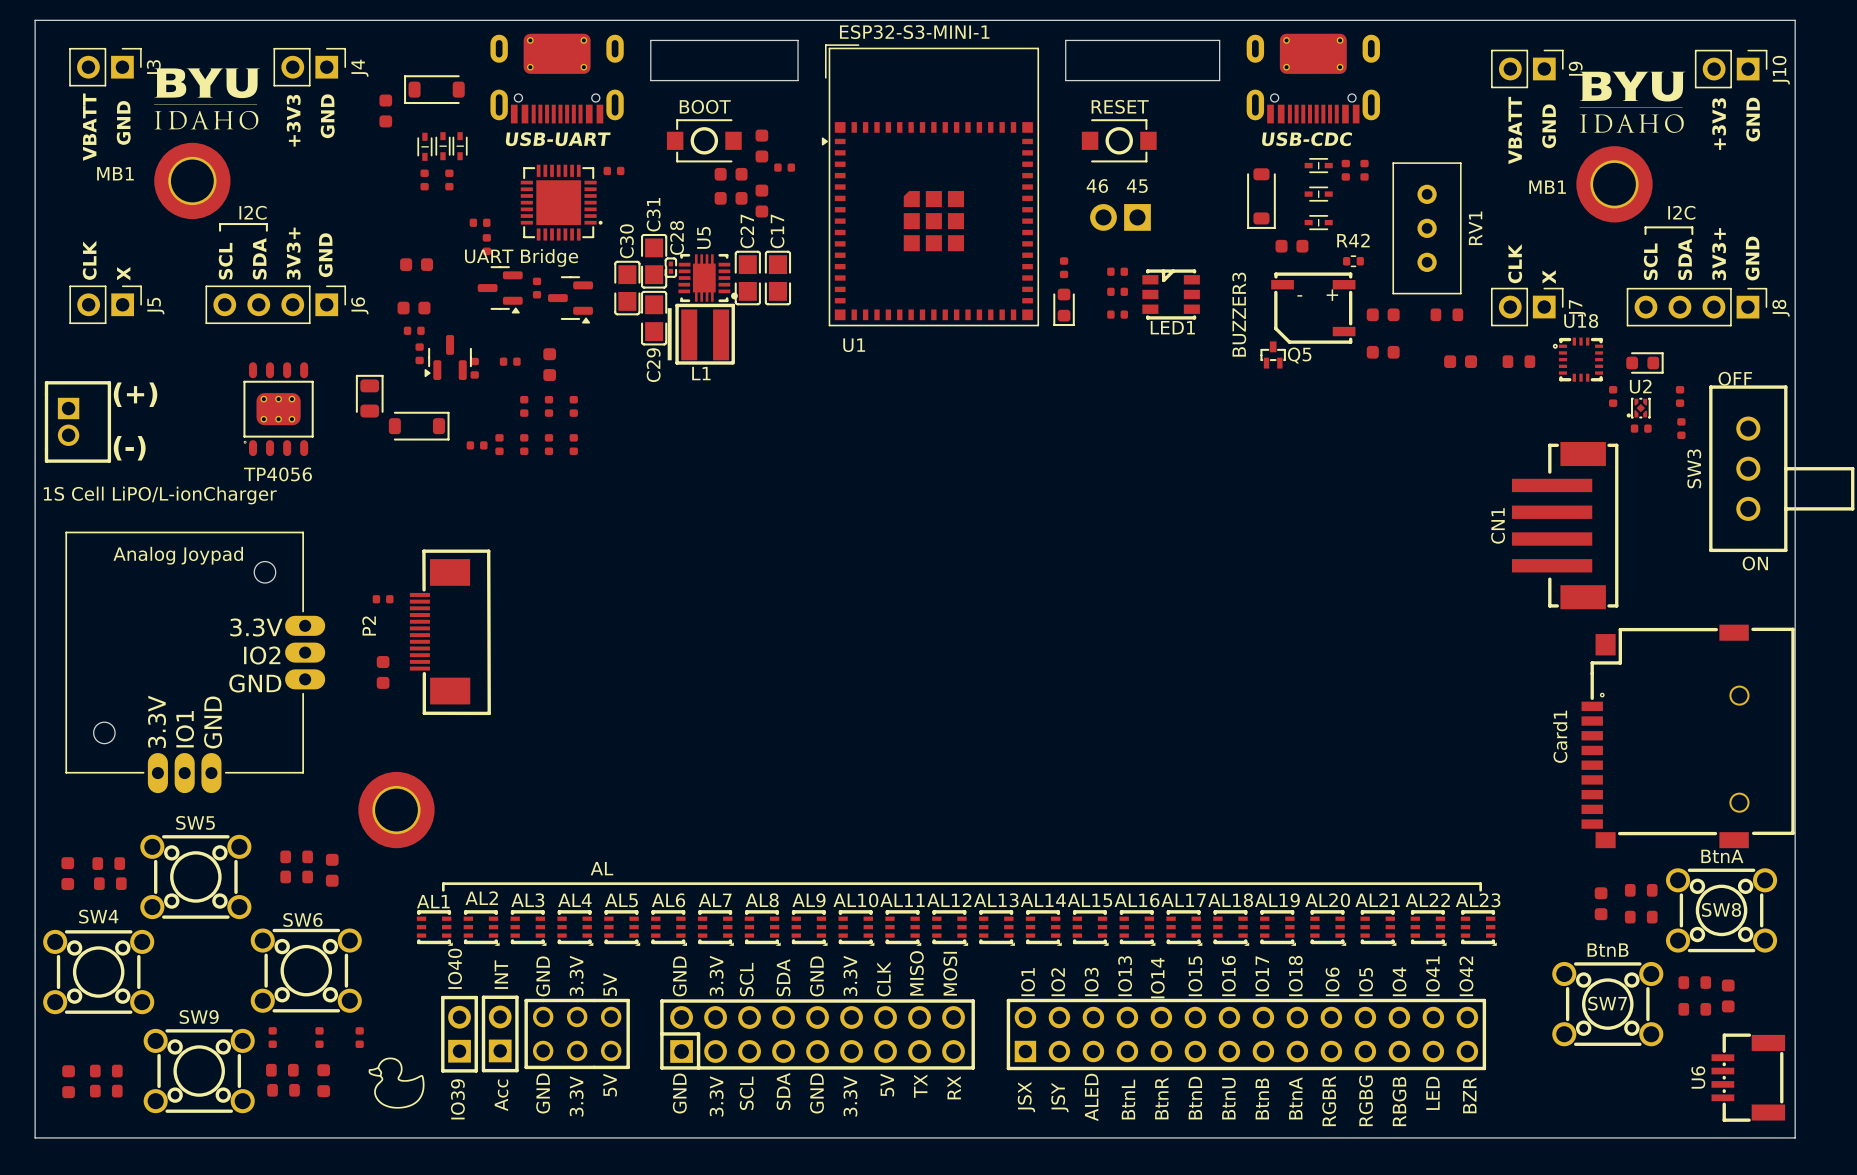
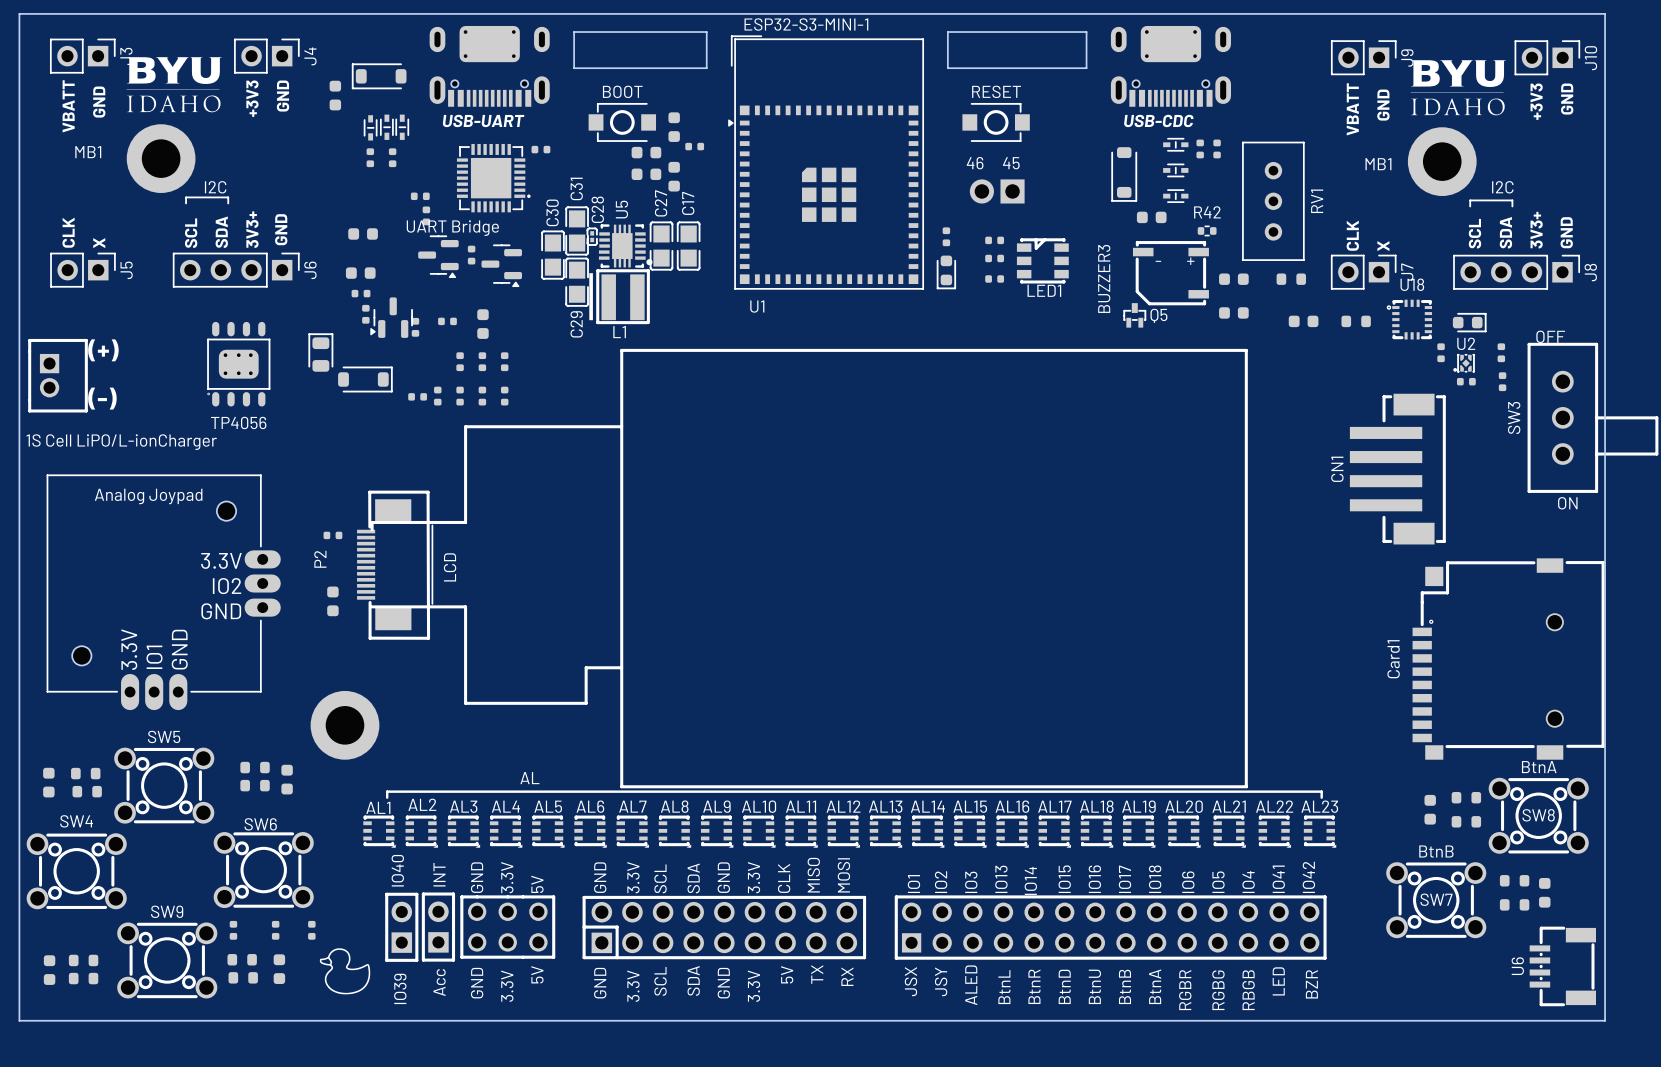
LCD: none -> (809, 568)

